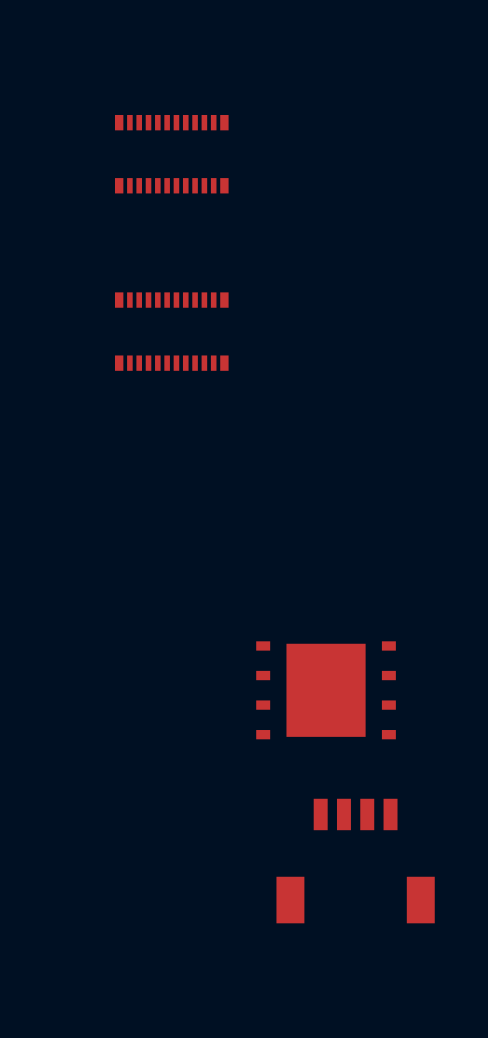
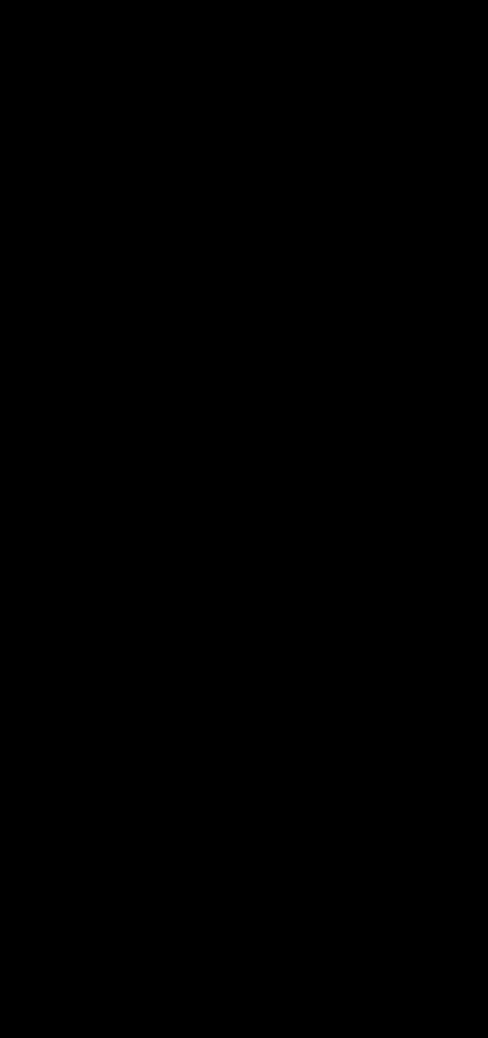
part: (171, 154) -> none
part: (171, 331) -> none
part: (326, 690) -> none
part: (355, 861) -> none

